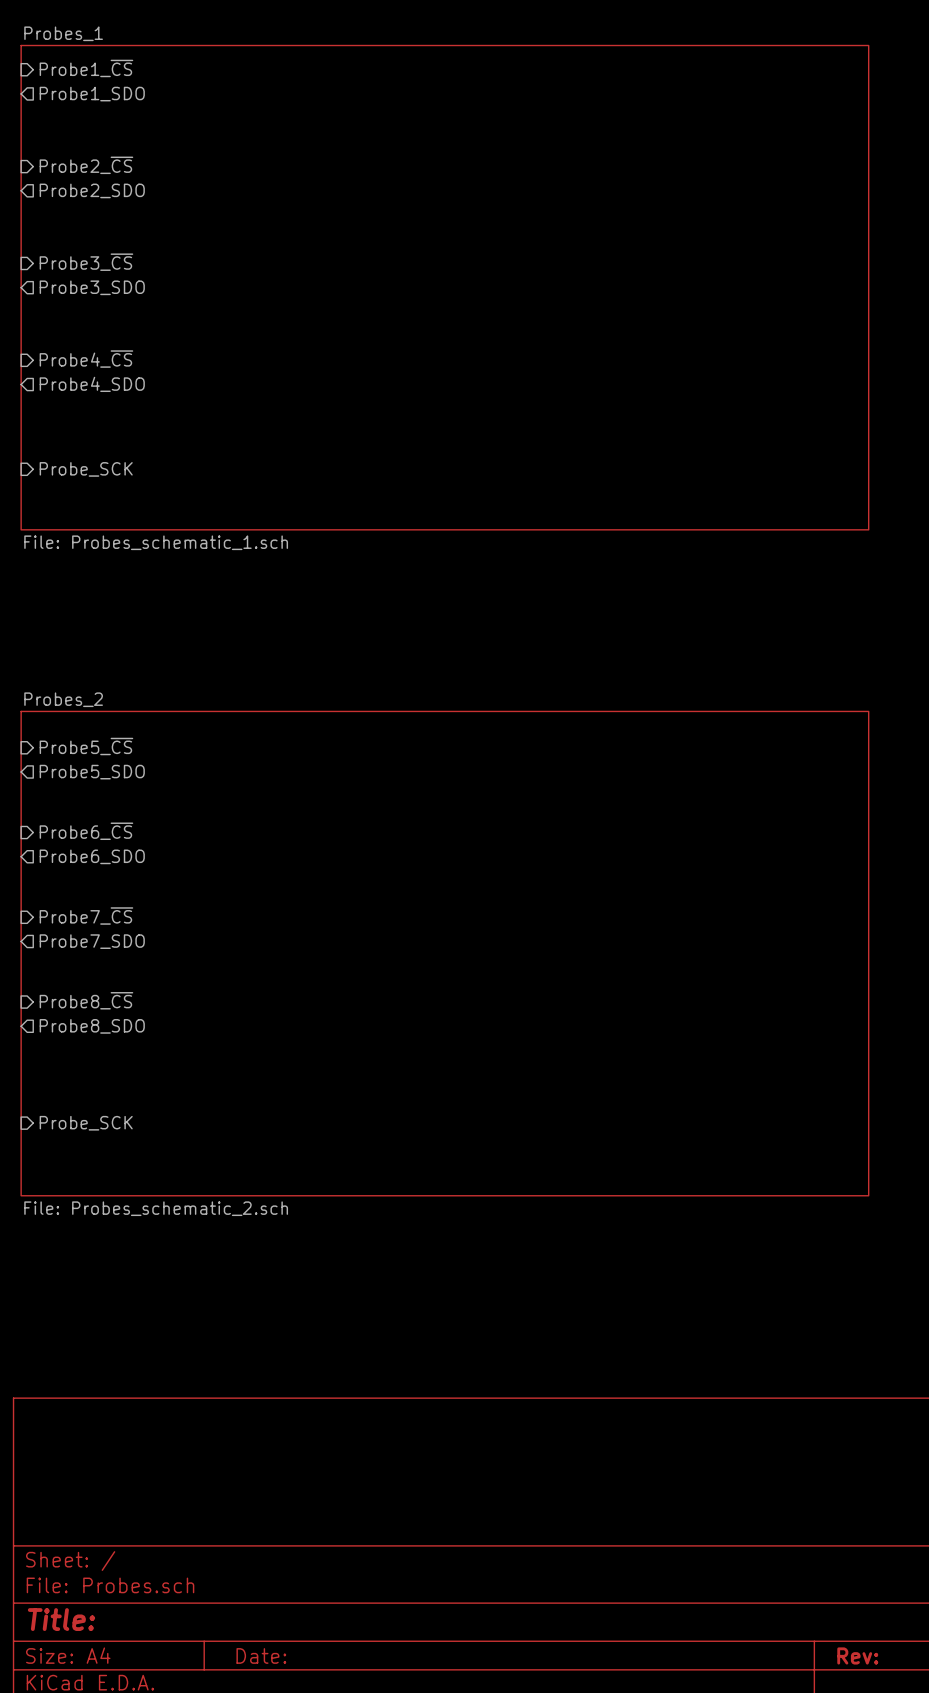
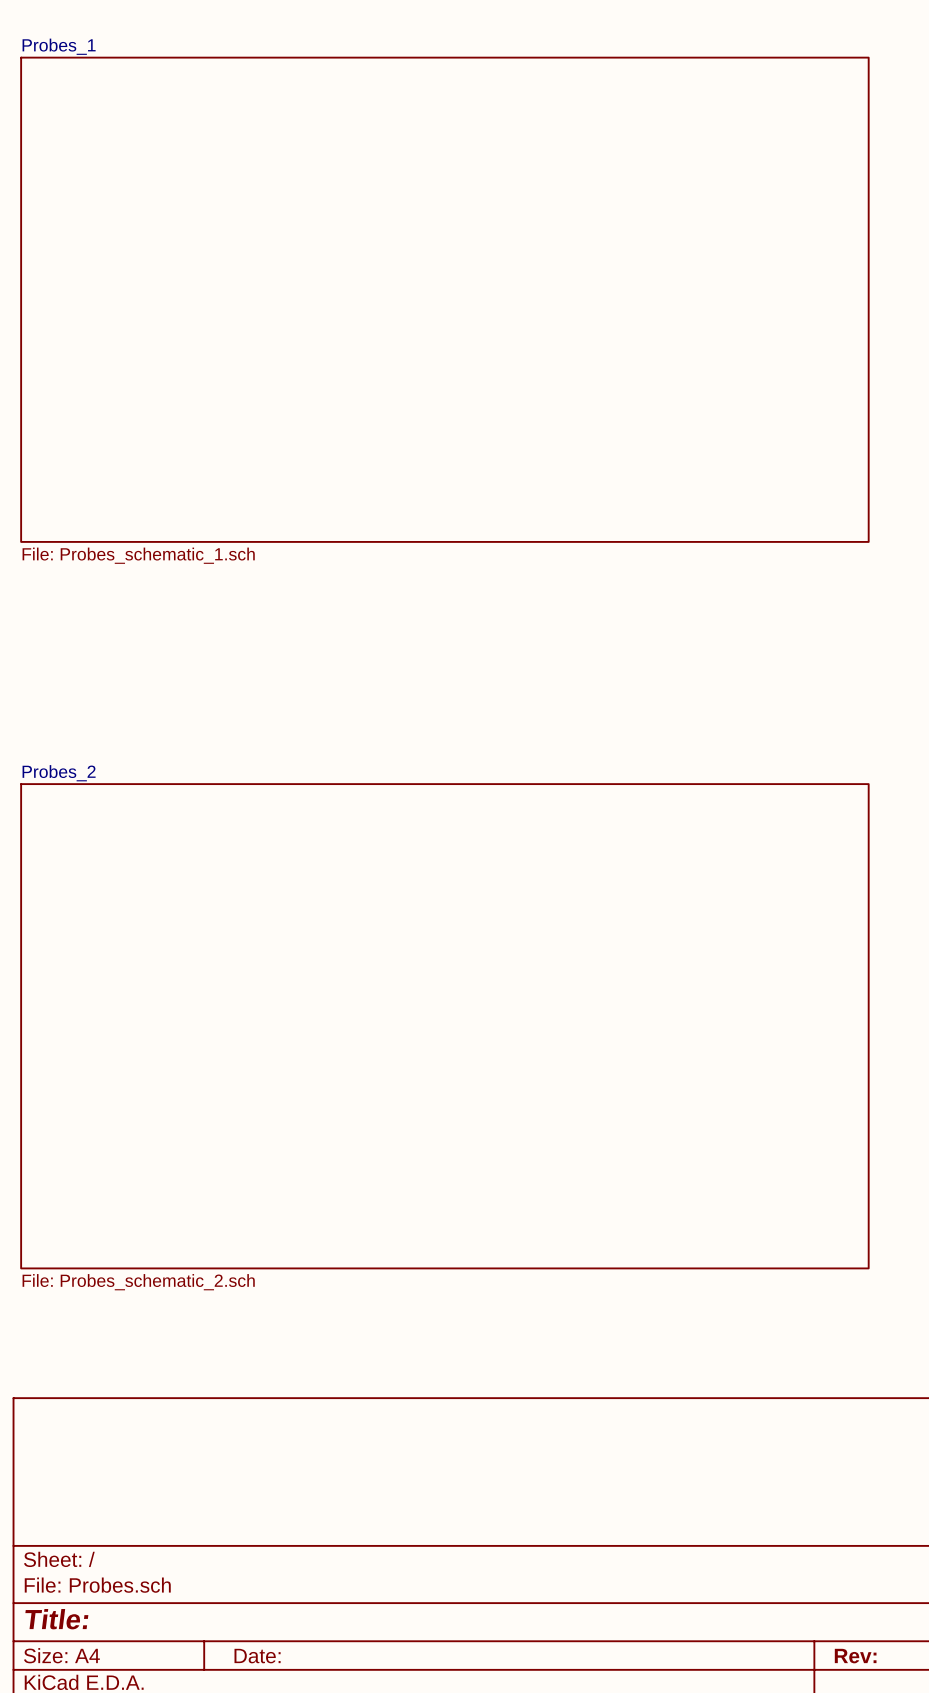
sheet pin: Probe1_~{CS} (86, 68) -> none
sheet pin: Probe1_SDO (92, 94) -> none
sheet pin: Probe2_~{CS} (86, 165) -> none
sheet pin: Probe2_SDO (92, 190) -> none
sheet pin: Probe3_~{CS} (86, 262) -> none
sheet pin: Probe3_SDO (92, 287) -> none
sheet Probes_1 position: (444, 287) -> (444, 299)
sheet pin: Probe4_~{CS} (86, 359) -> none
sheet pin: Probe4_SDO (92, 384) -> none
sheet pin: Probe_SCK (86, 469) -> none
sheet pin: Probe5_~{CS} (86, 746) -> none
sheet pin: Probe5_SDO (92, 772) -> none
sheet pin: Probe6_~{CS} (86, 831) -> none
sheet pin: Probe6_SDO (92, 856) -> none
sheet pin: Probe7_~{CS} (86, 916) -> none
sheet pin: Probe7_SDO (92, 941) -> none
sheet Probes_2 position: (444, 953) -> (444, 1026)
sheet pin: Probe8_~{CS} (86, 1000) -> none
sheet pin: Probe8_SDO (92, 1026) -> none
sheet pin: Probe_SCK (86, 1123) -> none

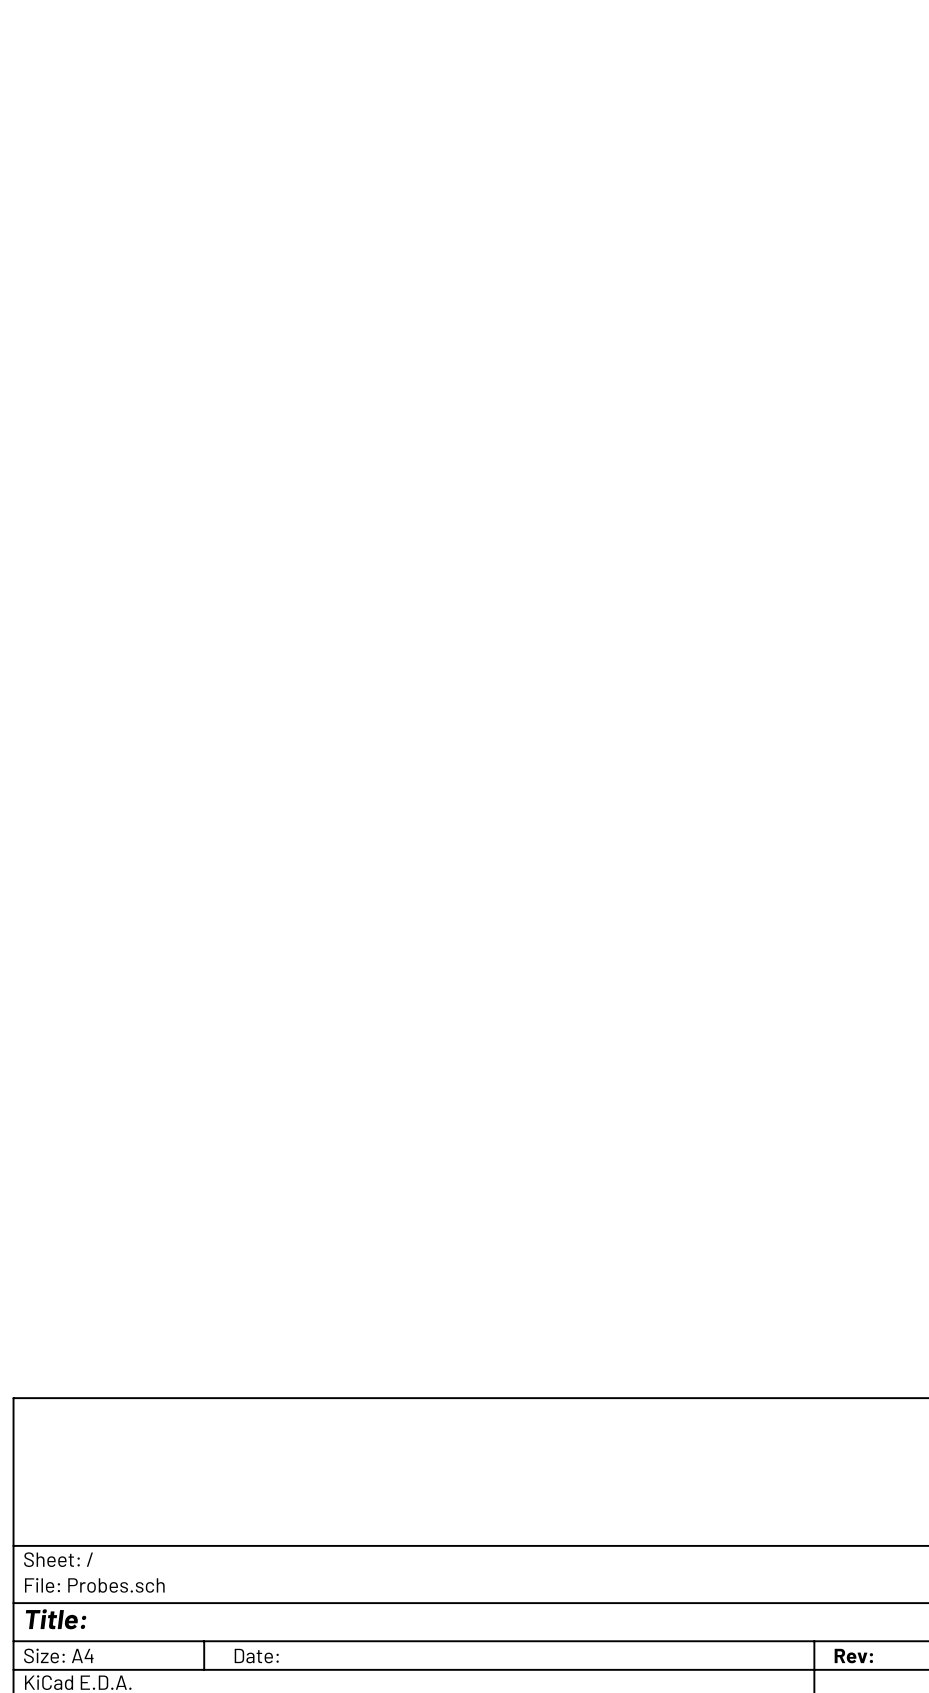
sheet Probes_1: File: Probes_schematic_1.sch (444, 299) -> none
sheet Probes_2: File: Probes_schematic_2.sch (444, 1026) -> none

